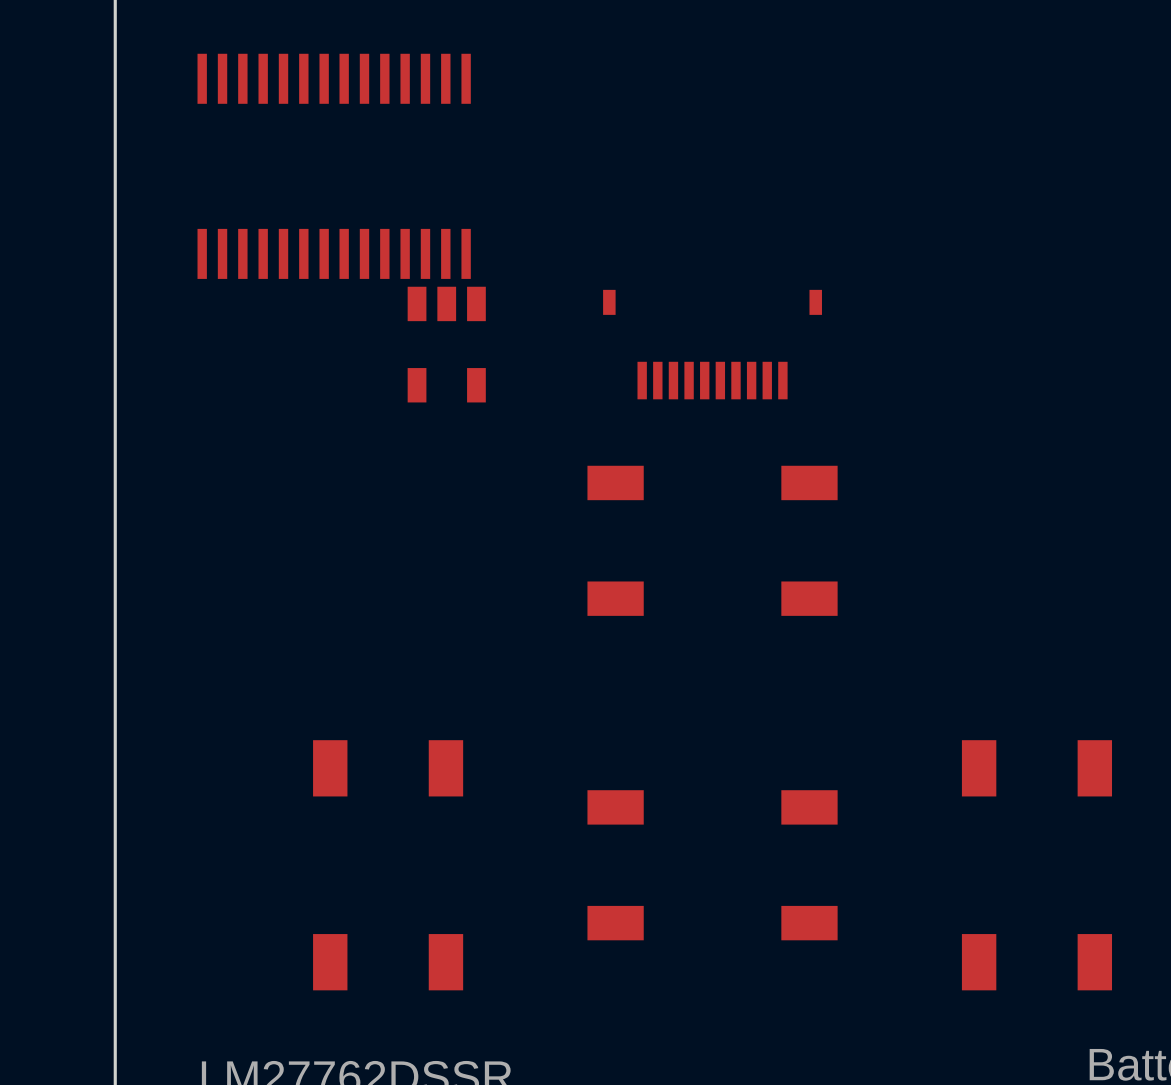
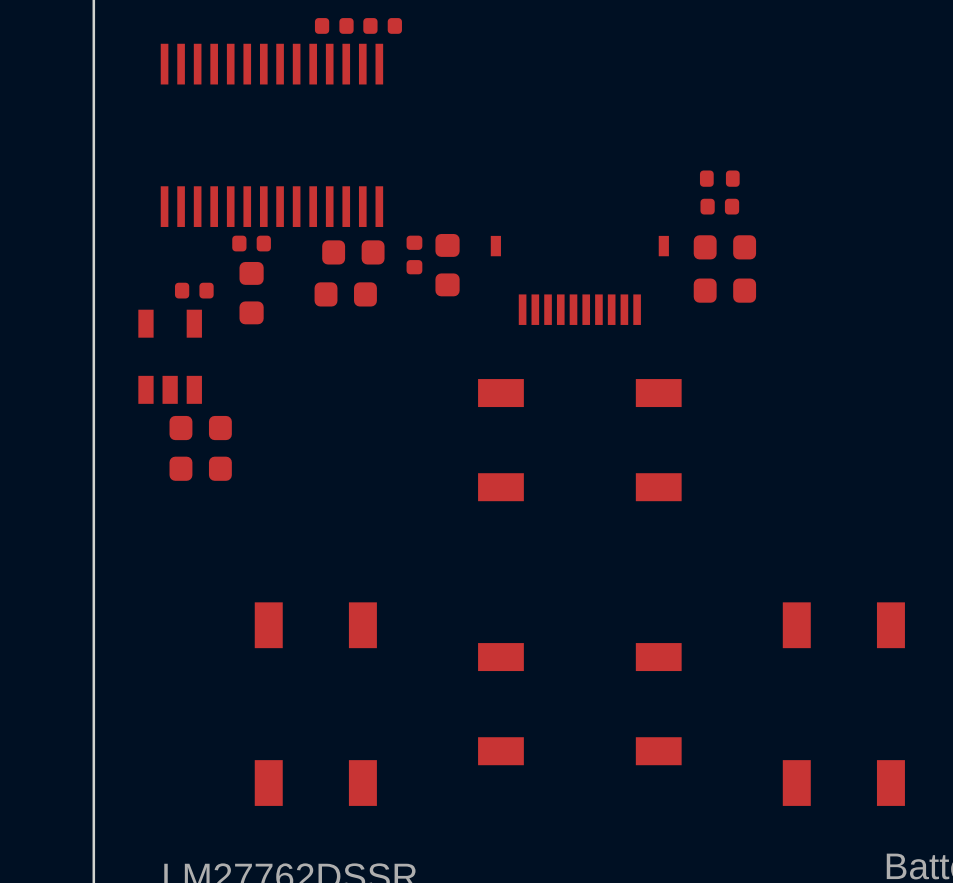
part: none -> (334, 25)
part: none -> (382, 25)
part: none -> (719, 178)
part: none -> (719, 206)
part: none -> (251, 243)
part: none -> (724, 247)
part: none -> (353, 252)
part: none -> (414, 254)
part: none -> (447, 265)
part rotation: 0° (446, 344) -> 180° (170, 356)
part position: (446, 344) -> (170, 356)
part: none -> (194, 290)
part: none -> (724, 290)
part: none -> (251, 293)
part: none -> (345, 294)
part: none -> (200, 428)
part: none -> (200, 468)

